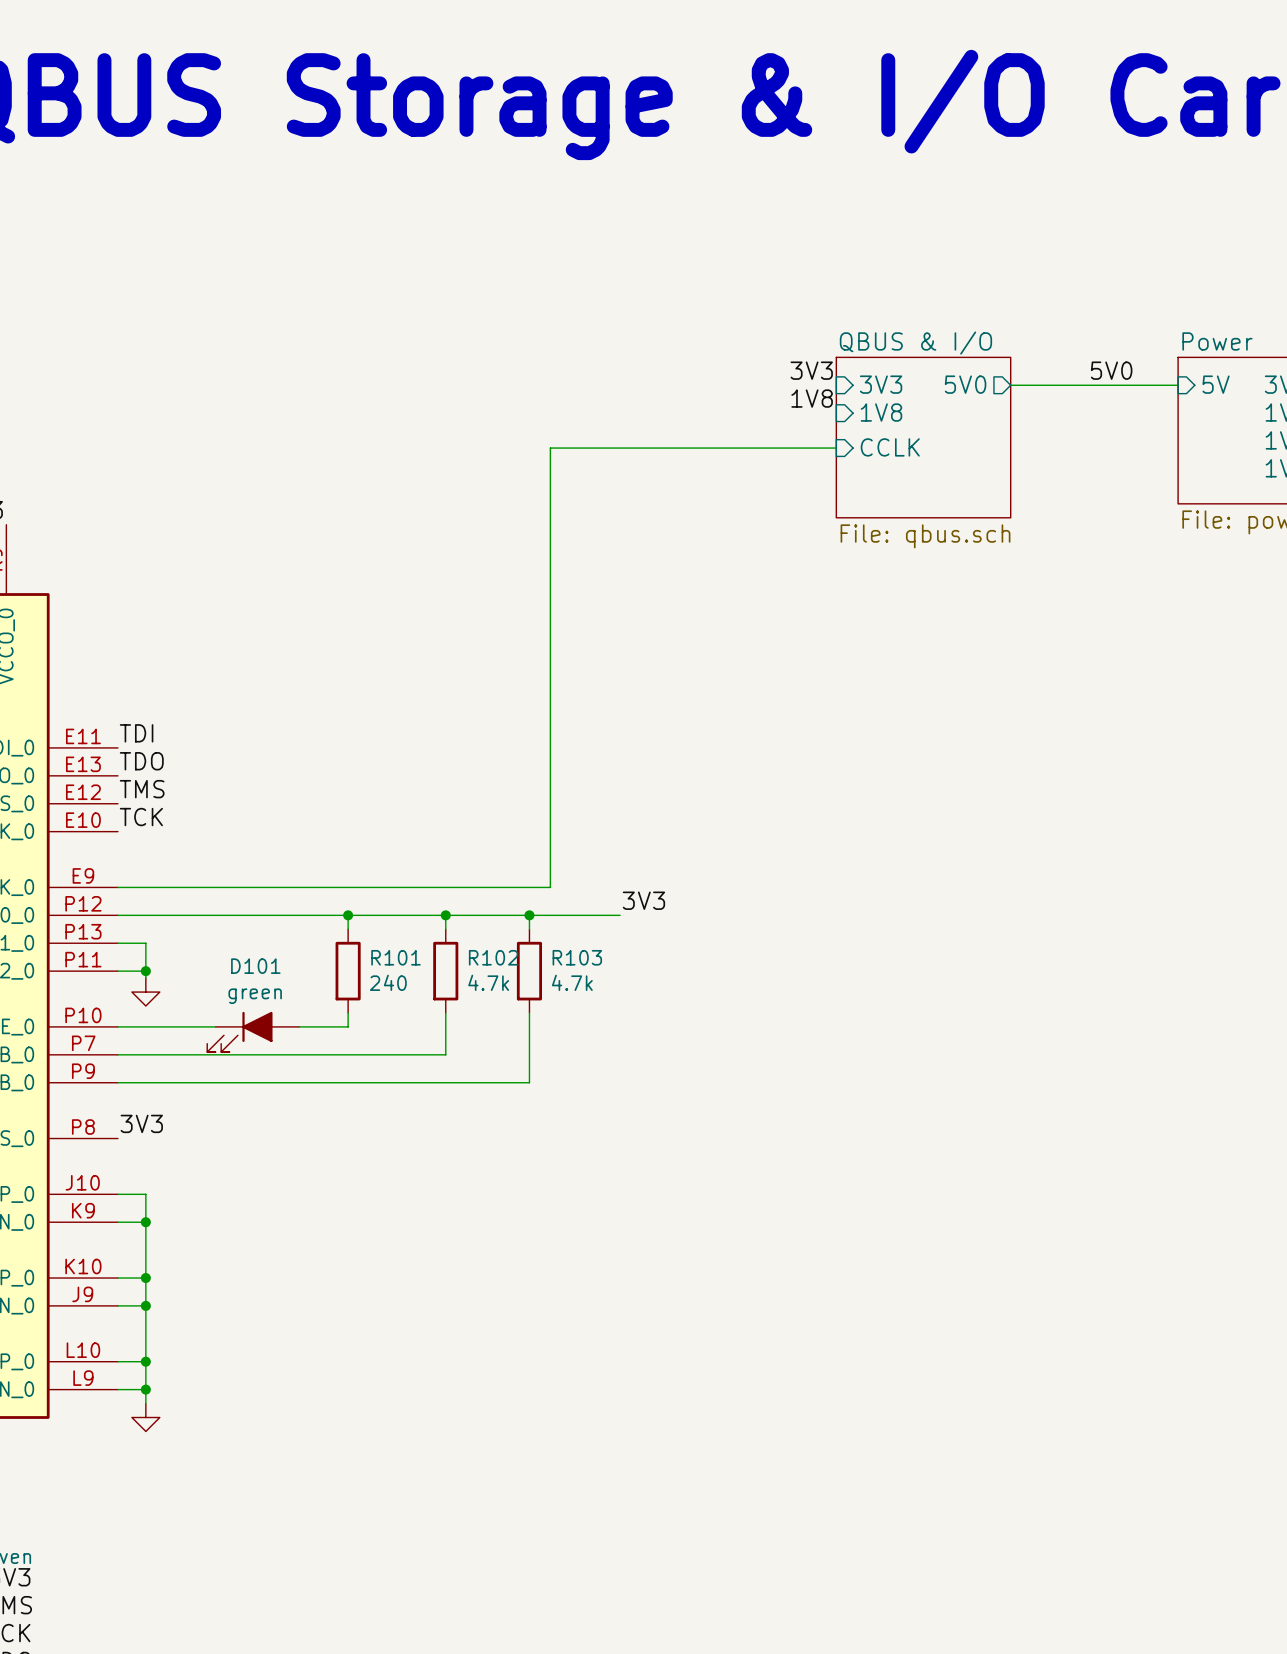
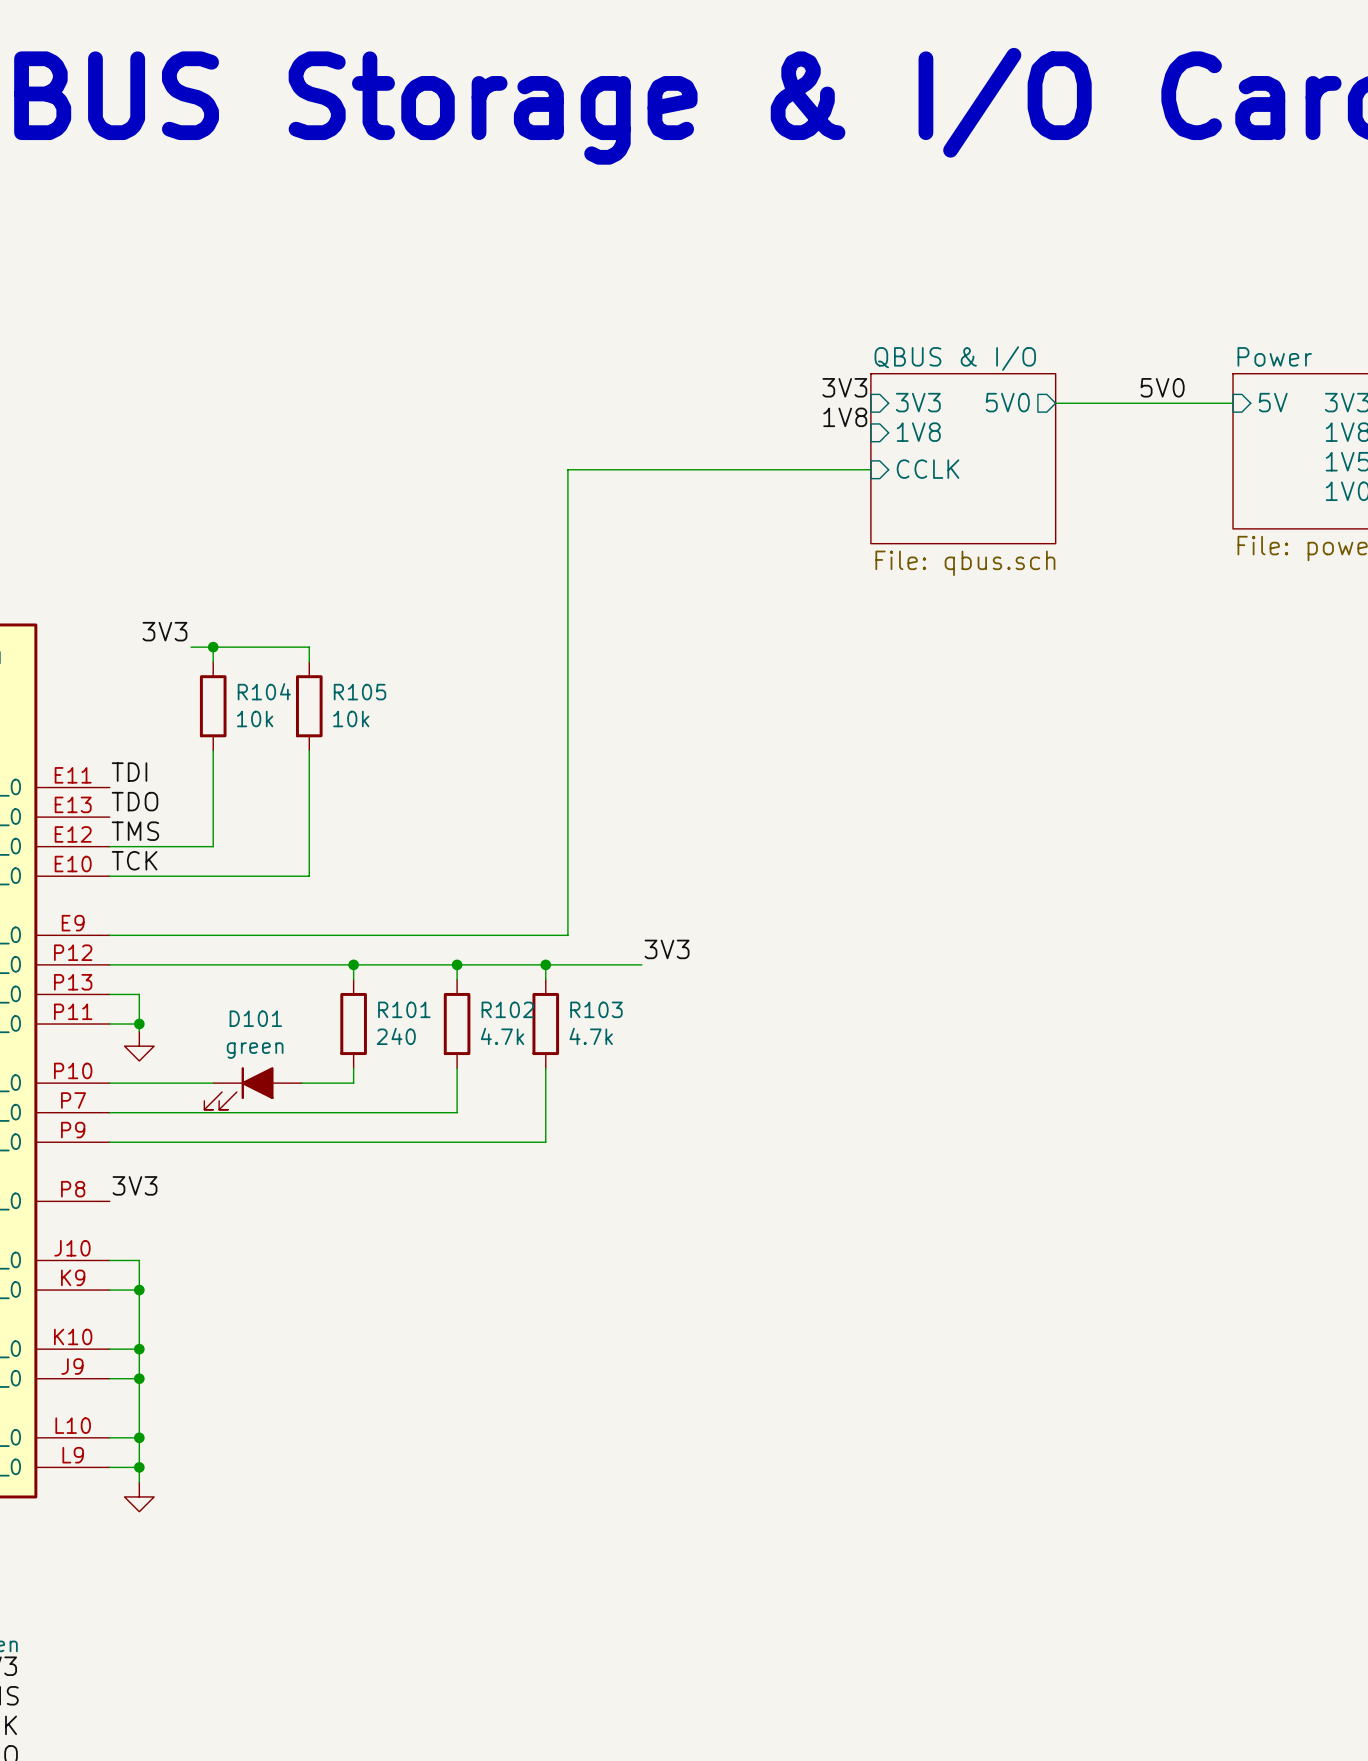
label: none -> 3V3 (164, 631)
wire: none -> (191, 647) (309, 647) (309, 661)
wire: none -> (213, 647) (213, 661)
junction: none -> (213, 647)
R104: none -> 10k (213, 706)
R105: none -> 10k (309, 706)
wire: none -> (213, 750) (213, 846) (109, 846)
wire: none -> (309, 750) (309, 876) (109, 876)

